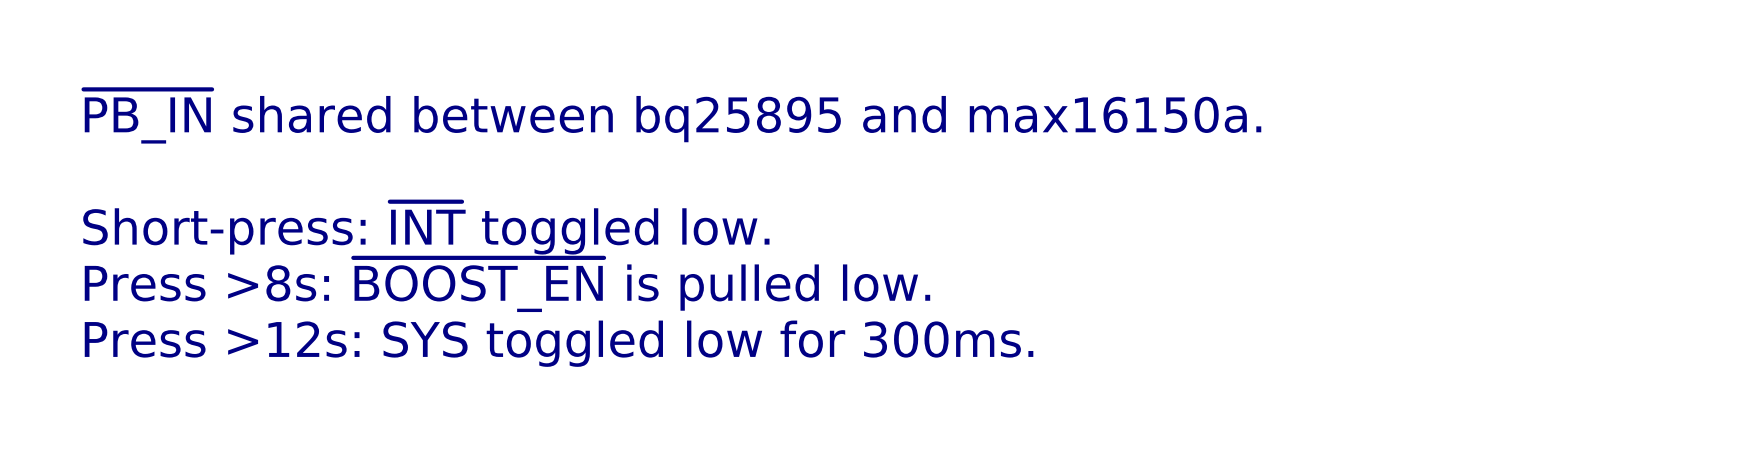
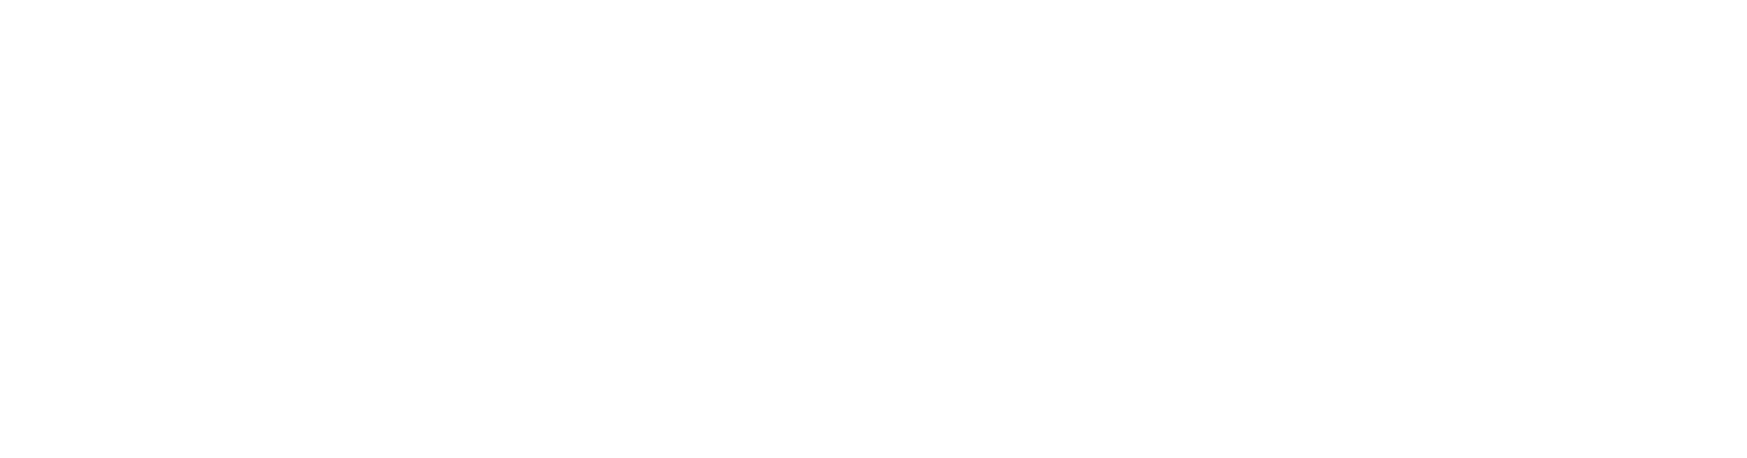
text: ~{PB_IN} shared between bq25895 and max16150a. (672, 116) -> none
text: Short-press: ~{INT} toggled low. (426, 228) -> none
text: Press >8s: ~{BOOST_EN} is pulled low. (507, 284) -> none
text: Press >12s: SYS toggled low for 300ms. (559, 343) -> none

